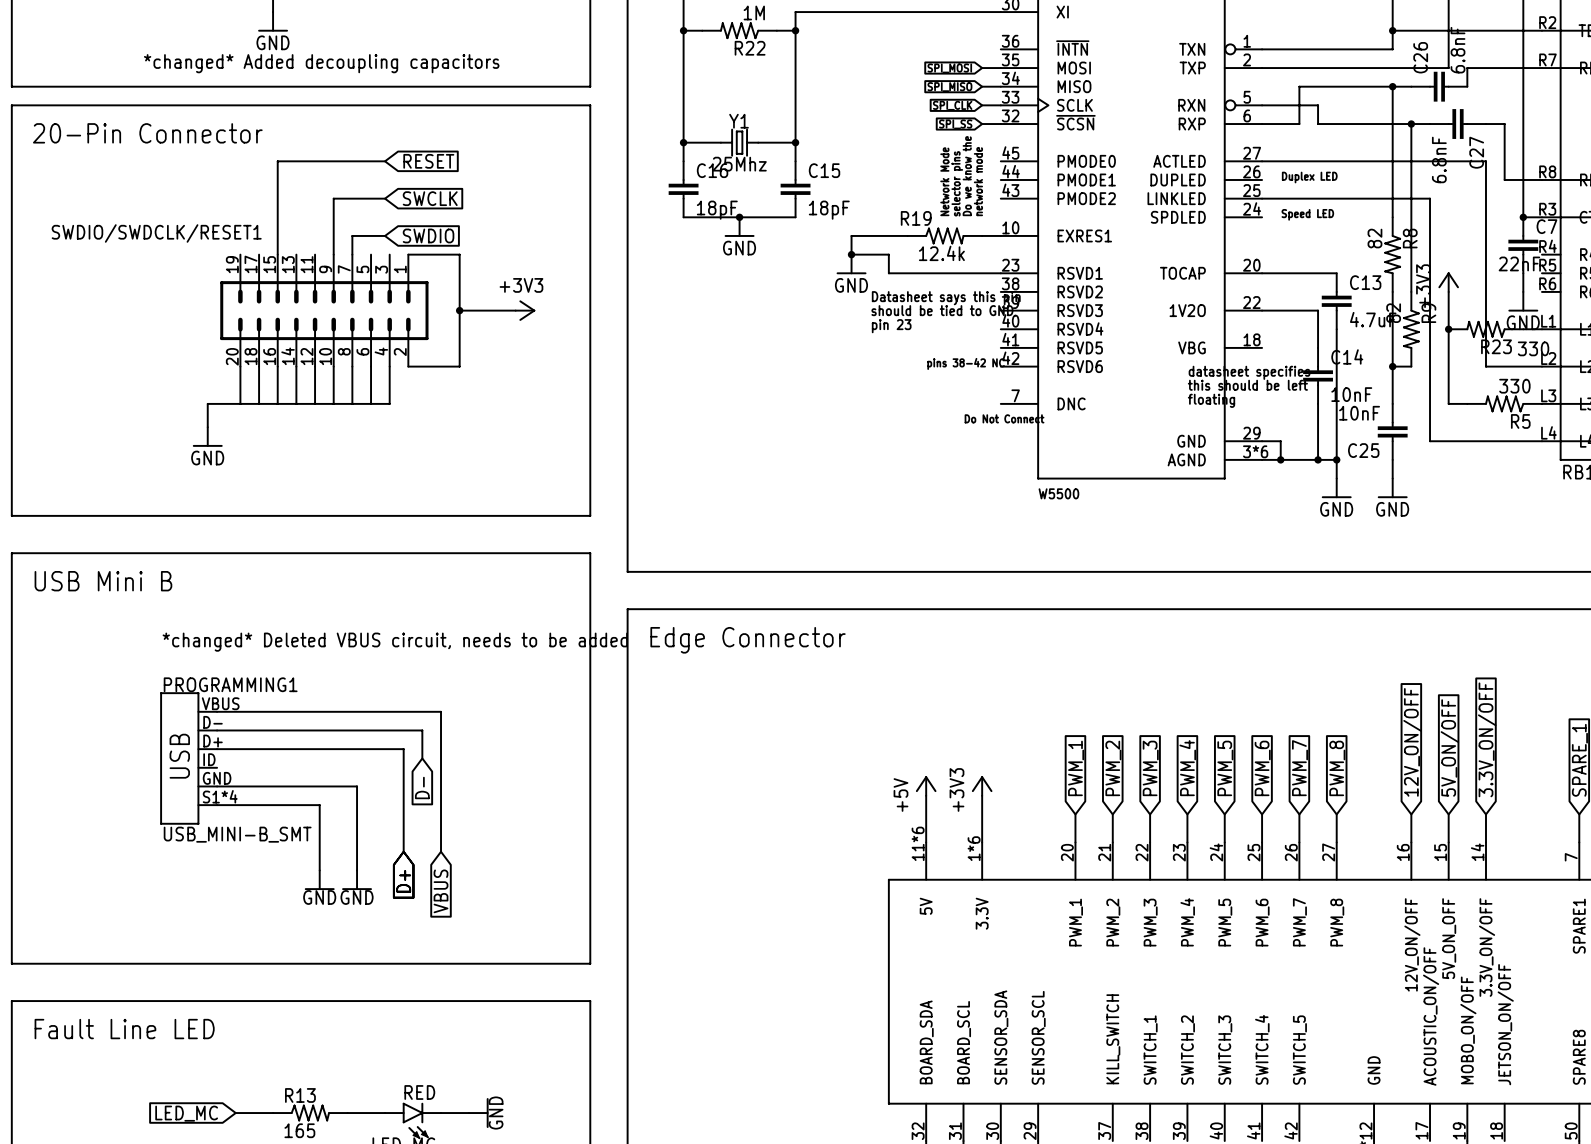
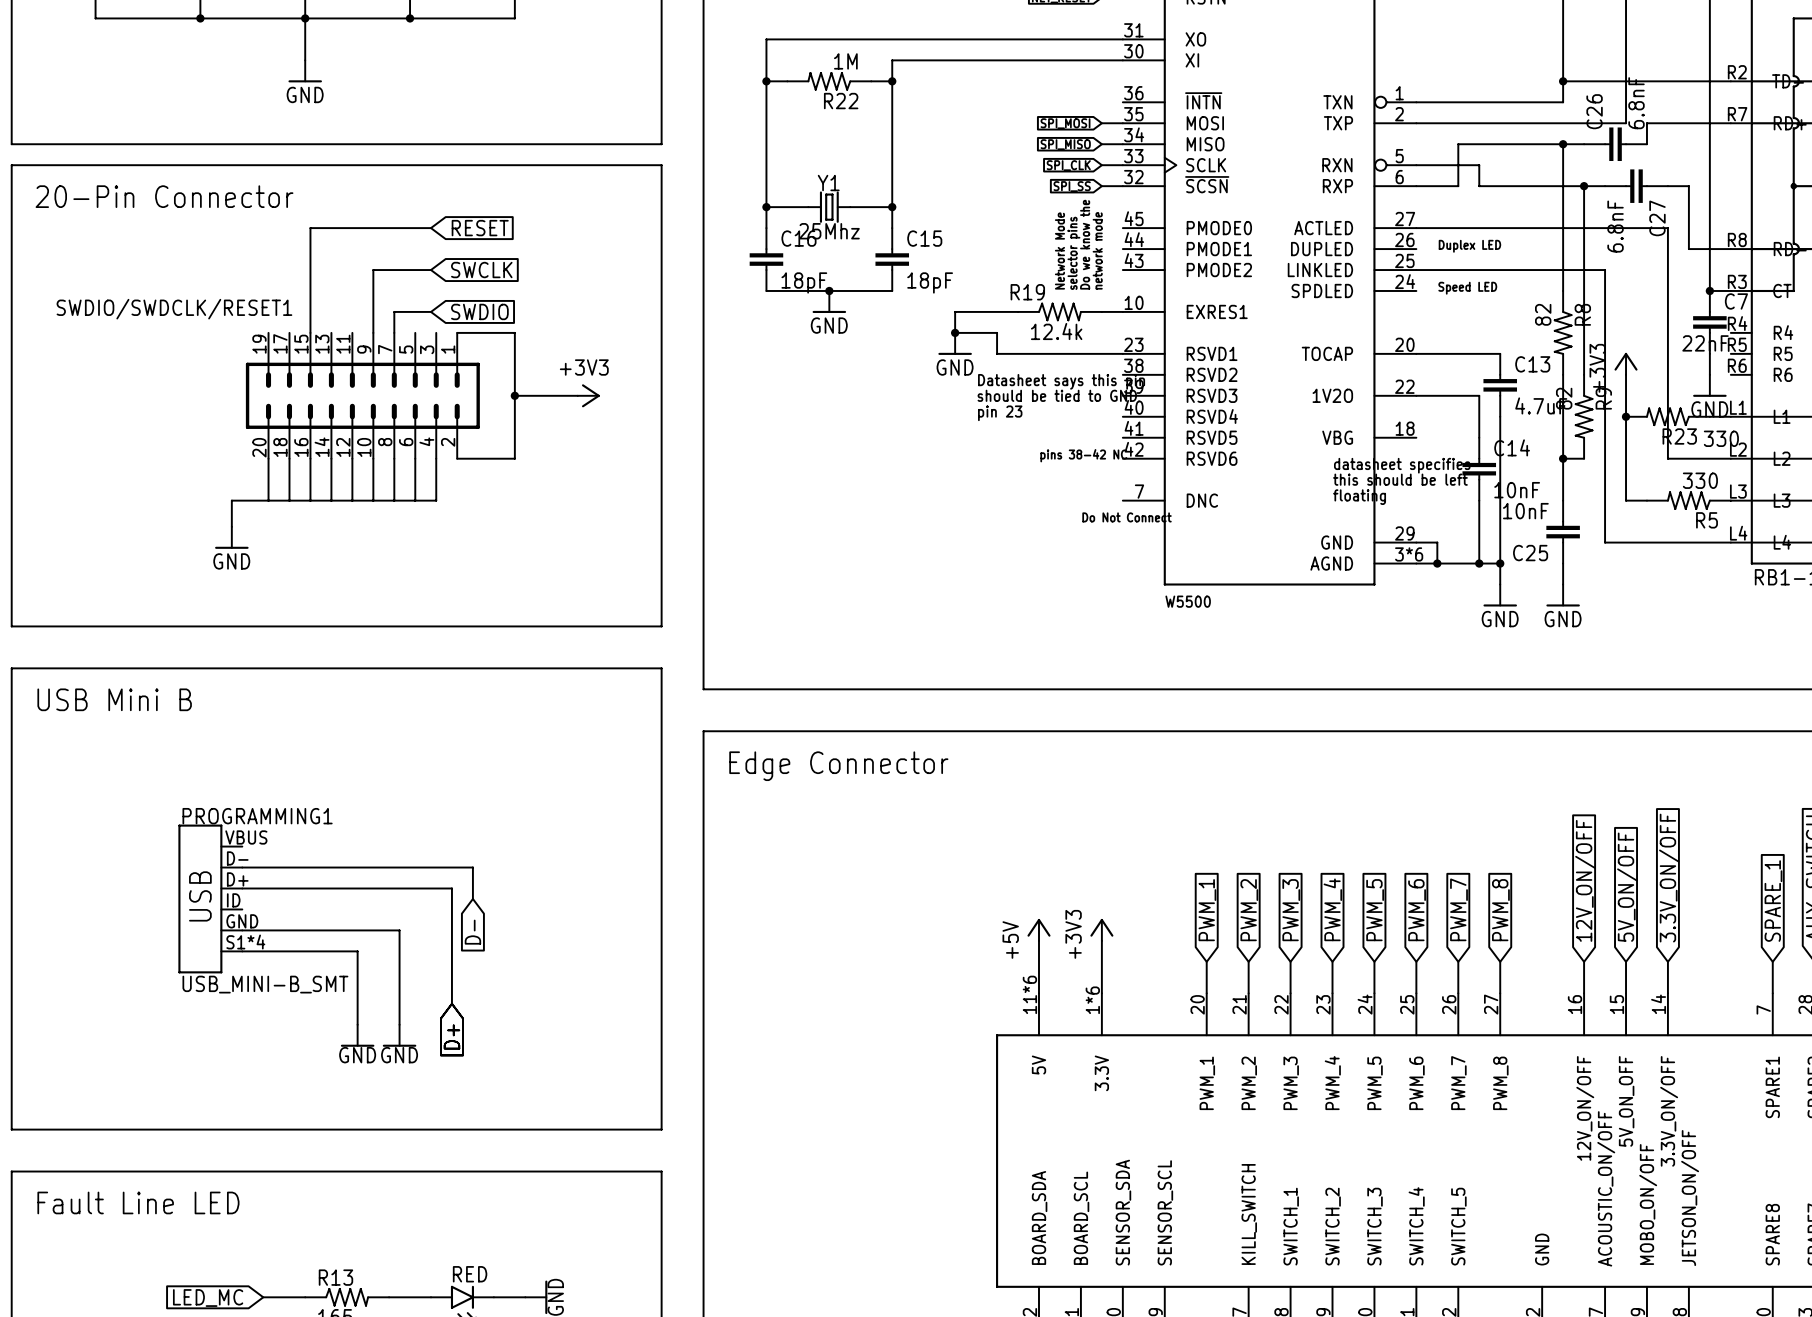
text: *changed* Added decoupling capacitors (321, 63) -> none
text: *changed* Deleted VBUS circuit, needs to be added (395, 642) -> none
wire: (217, 711) (441, 711) (441, 851) -> none
global label: VBUS (441, 891) -> none

